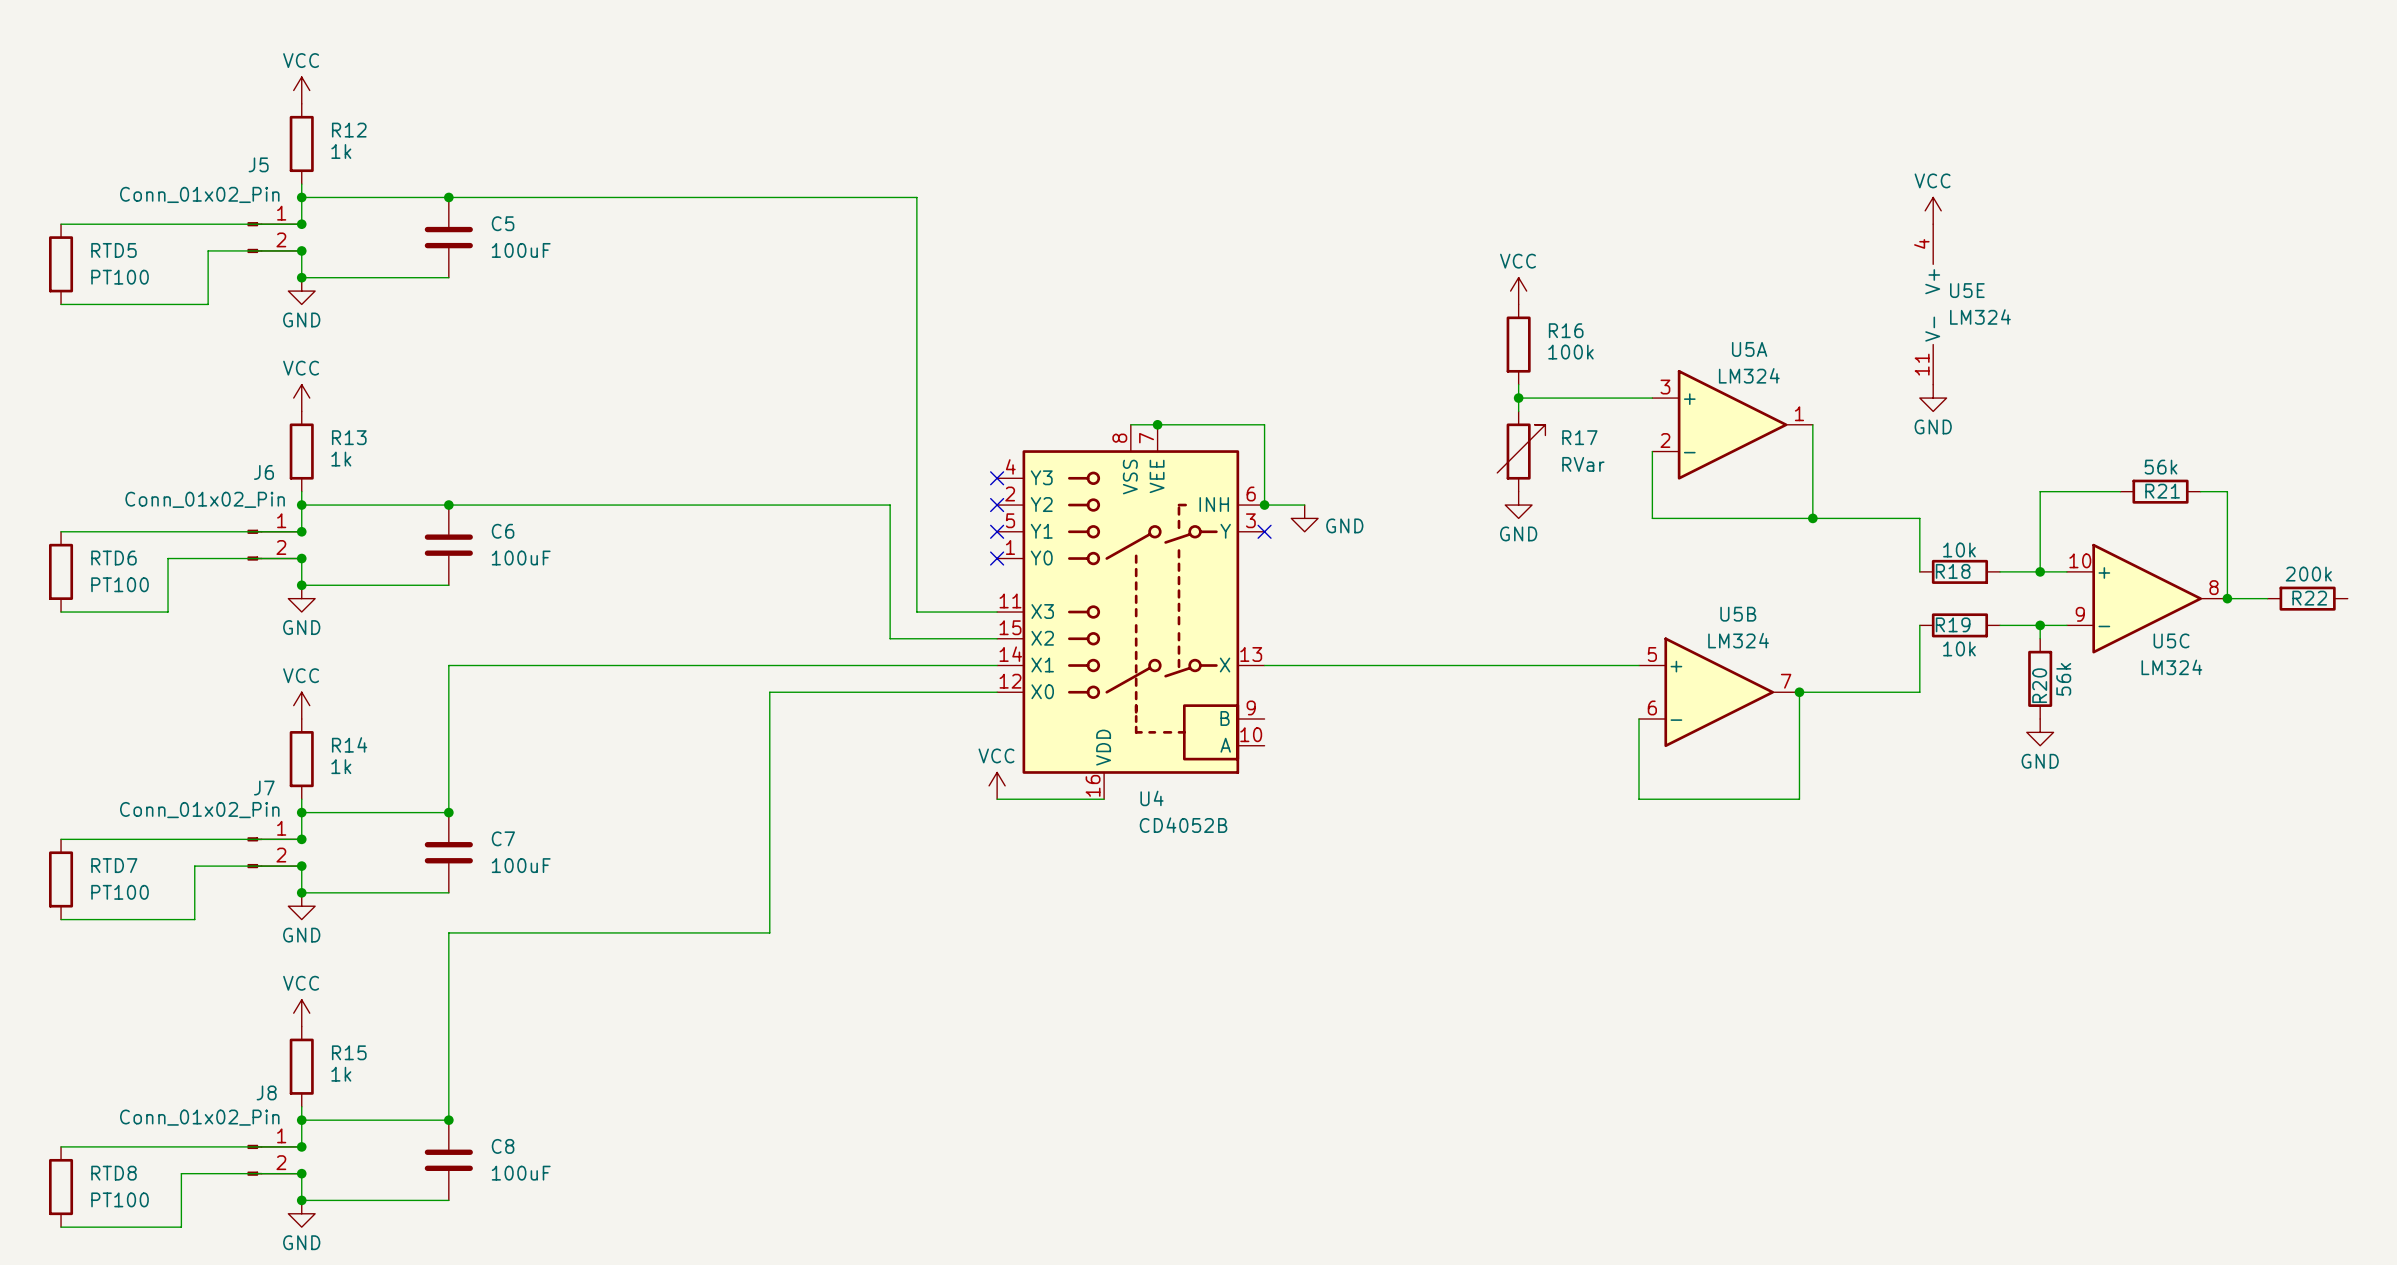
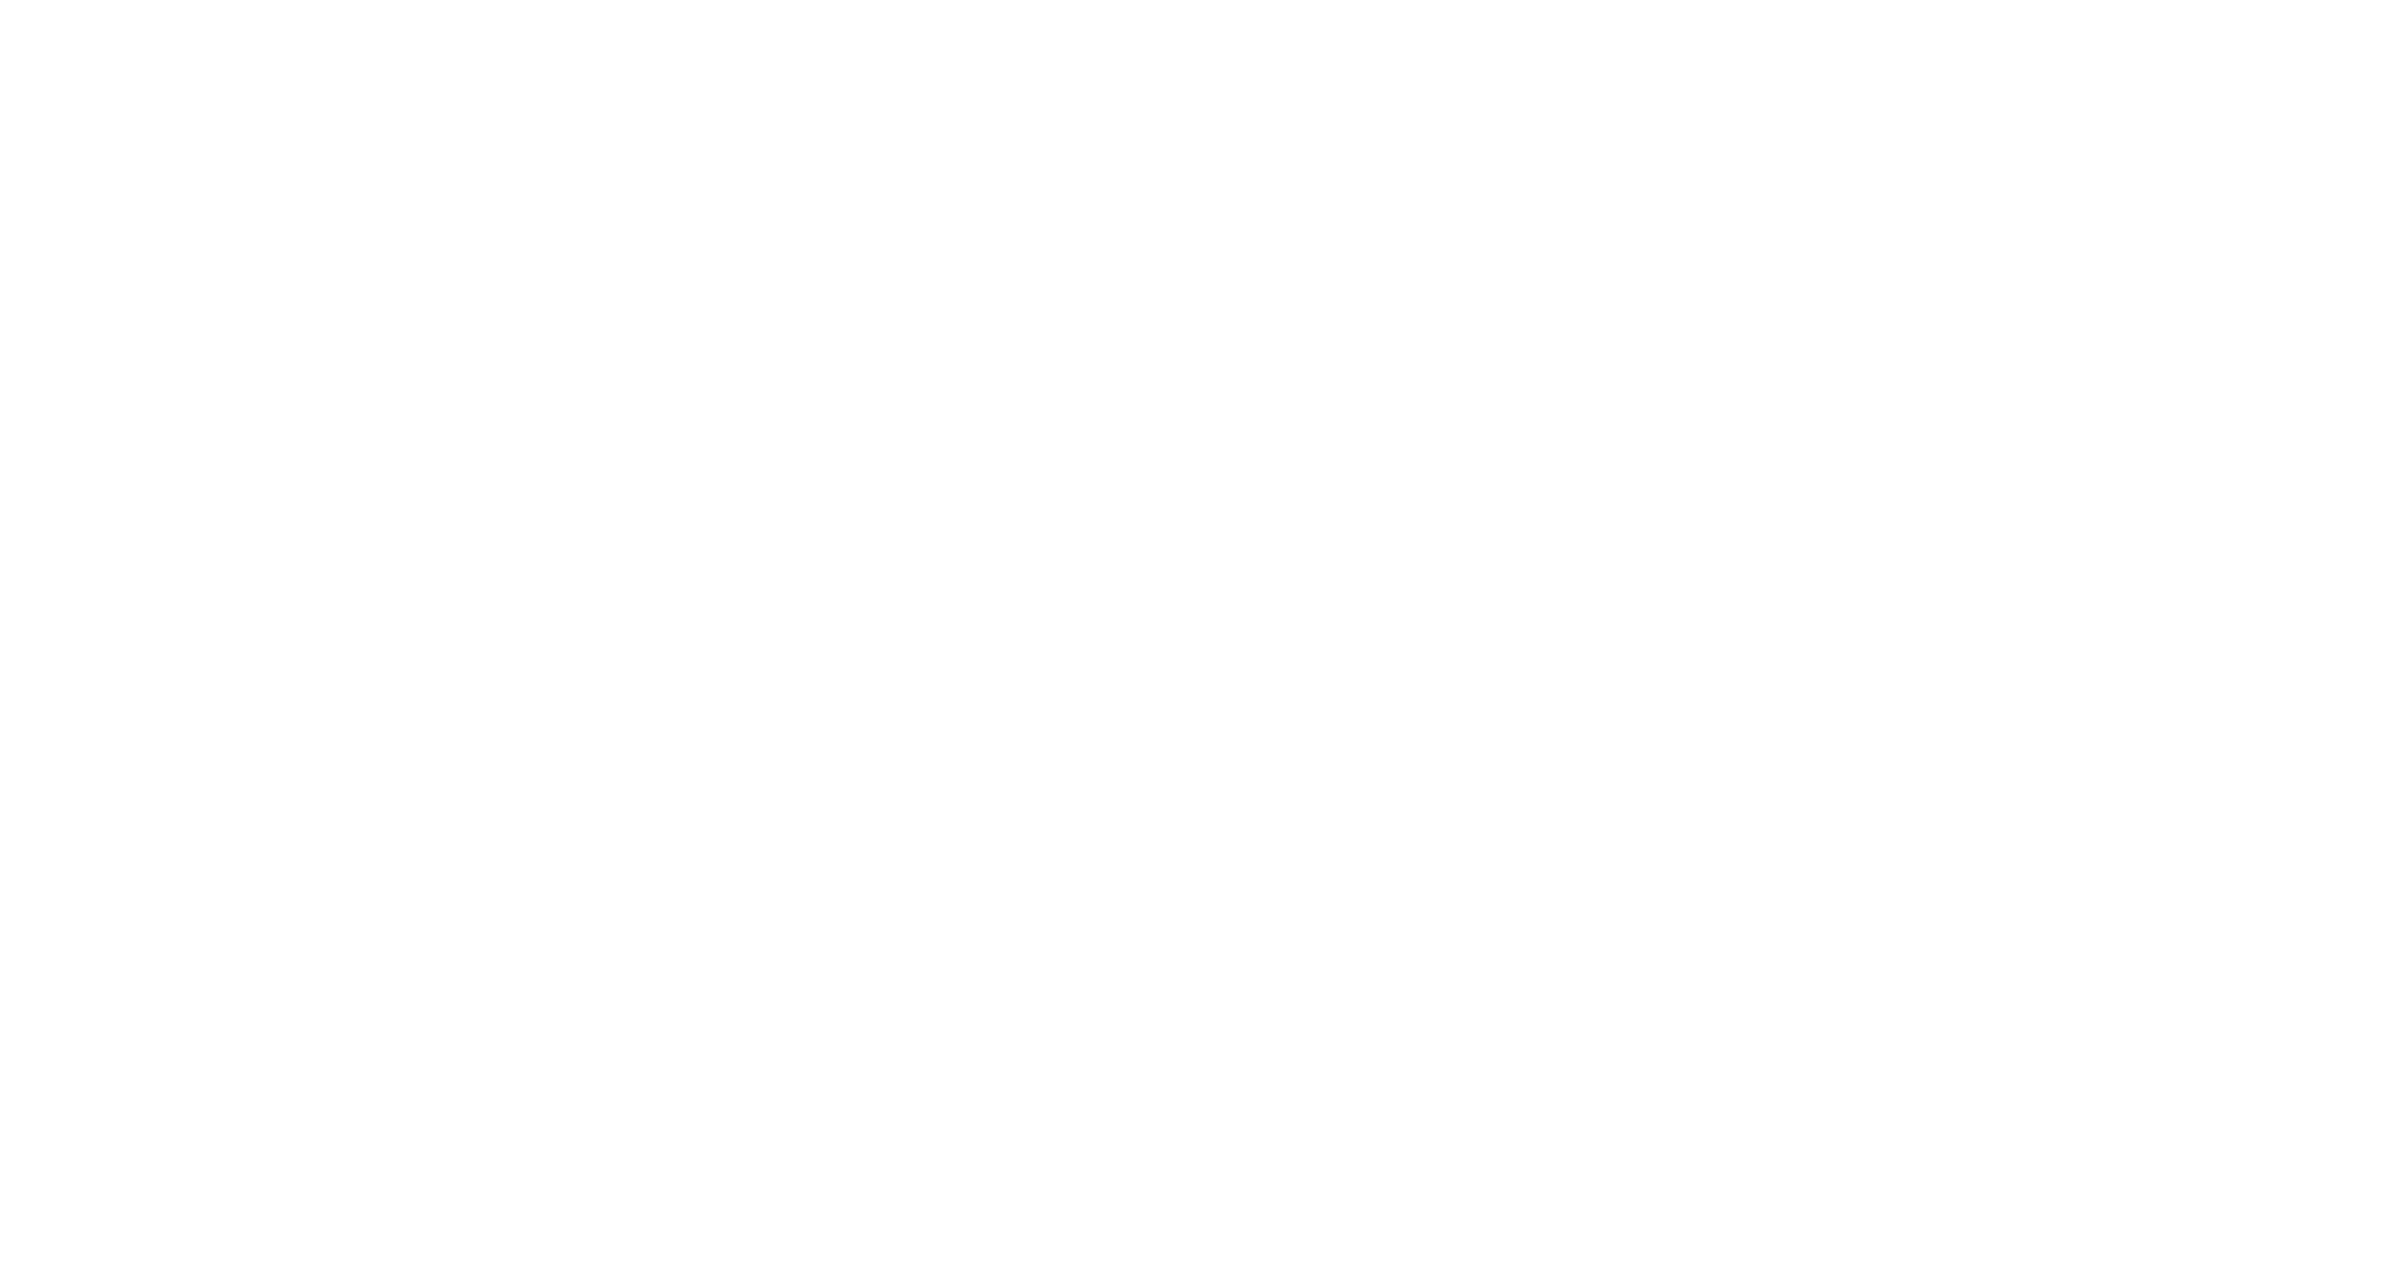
power symbol: VCC (301, 90) -> none
R12: 1k (301, 143) -> none
wire: (301, 184) (301, 224) (61, 224) -> none
wire: (301, 197) (916, 197) (916, 612) (997, 612) -> none
junction: (301, 197) -> none
junction: (448, 197) -> none
power symbol: VCC (1933, 210) -> none
junction: (301, 224) -> none
J5: Conn_01x02_Pin (274, 237) -> none
C5: 100uF (448, 237) -> none
junction: (301, 250) -> none
RTD5: PT100 (61, 264) -> none
junction: (301, 277) -> none
wire: (448, 277) (301, 277) (301, 250) (208, 250) (208, 304) (61, 304) -> none
power symbol: GND (301, 291) -> none
power symbol: VCC (1518, 291) -> none
U5E: LM324 (1933, 304) -> none
R16: 100k (1518, 344) -> none
wire: (1518, 384) (1518, 411) -> none
power symbol: VCC (301, 398) -> none
wire: (1518, 398) (1652, 398) -> none
junction: (1518, 398) -> none
power symbol: GND (1933, 398) -> none
wire: (1130, 424) (1264, 424) (1264, 505) (1304, 505) -> none
junction: (1157, 424) -> none
U5A: LM324 (1732, 424) -> none
wire: (1812, 424) (1812, 518) -> none
R13: 1k (301, 451) -> none
R17: RVar (1521, 451) -> none
wire: (1652, 451) (1652, 518) (1919, 518) (1919, 571) -> none
no-connect mark: (997, 478) -> none
wire: (301, 491) (301, 531) (61, 531) -> none
wire: (2120, 491) (2040, 491) (2040, 571) -> none
R21: 56k (2160, 491) -> none
wire: (2200, 491) (2227, 491) (2227, 598) (2267, 598) -> none
wire: (301, 505) (890, 505) (890, 638) (997, 638) -> none
junction: (301, 505) -> none
junction: (448, 505) -> none
no-connect mark: (997, 505) -> none
junction: (1264, 505) -> none
power symbol: GND (1518, 505) -> none
power symbol: GND (1304, 518) -> none
junction: (1812, 518) -> none
junction: (301, 531) -> none
no-connect mark: (997, 531) -> none
no-connect mark: (1264, 531) -> none
J6: Conn_01x02_Pin (274, 545) -> none
C6: 100uF (448, 545) -> none
junction: (301, 558) -> none
no-connect mark: (997, 558) -> none
RTD6: PT100 (61, 571) -> none
R18: 10k (1959, 571) -> none
wire: (2000, 571) (2066, 571) -> none
junction: (2040, 571) -> none
junction: (301, 585) -> none
wire: (448, 585) (301, 585) (301, 558) (168, 558) (168, 612) (61, 612) -> none
power symbol: GND (301, 598) -> none
U5C: LM324 (2147, 598) -> none
junction: (2227, 598) -> none
R22: 200k (2307, 598) -> none
U4: CD4052B (1130, 612) -> none
wire: (1919, 625) (1919, 692) (1799, 692) (1799, 799) (1639, 799) (1639, 718) -> none
R19: 10k (1959, 625) -> none
wire: (2000, 625) (2066, 625) -> none
wire: (2040, 625) (2040, 638) -> none
junction: (2040, 625) -> none
wire: (997, 665) (448, 665) (448, 812) (301, 812) -> none
wire: (1264, 665) (1639, 665) -> none
R20: 56k (2040, 678) -> none
wire: (997, 692) (769, 692) (769, 932) (448, 932) (448, 1120) (301, 1120) -> none
U5B: LM324 (1719, 692) -> none
junction: (1799, 692) -> none
power symbol: VCC (301, 705) -> none
power symbol: GND (2040, 732) -> none
R14: 1k (301, 759) -> none
power symbol: VCC (997, 785) -> none
wire: (301, 799) (301, 839) (61, 839) -> none
wire: (997, 799) (1104, 799) -> none
junction: (301, 812) -> none
junction: (448, 812) -> none
junction: (301, 839) -> none
J7: Conn_01x02_Pin (274, 852) -> none
C7: 100uF (448, 852) -> none
junction: (301, 866) -> none
RTD7: PT100 (61, 879) -> none
junction: (301, 892) -> none
wire: (448, 892) (301, 892) (301, 866) (194, 866) (194, 919) (61, 919) -> none
power symbol: GND (301, 906) -> none
power symbol: VCC (301, 1013) -> none
R15: 1k (301, 1066) -> none
wire: (301, 1106) (301, 1146) (61, 1146) -> none
junction: (301, 1120) -> none
junction: (448, 1120) -> none
junction: (301, 1146) -> none
J8: Conn_01x02_Pin (274, 1160) -> none
C8: 100uF (448, 1160) -> none
junction: (301, 1173) -> none
RTD8: PT100 (61, 1187) -> none
junction: (301, 1200) -> none
wire: (448, 1200) (301, 1200) (301, 1173) (181, 1173) (181, 1227) (61, 1227) -> none
power symbol: GND (301, 1213) -> none

